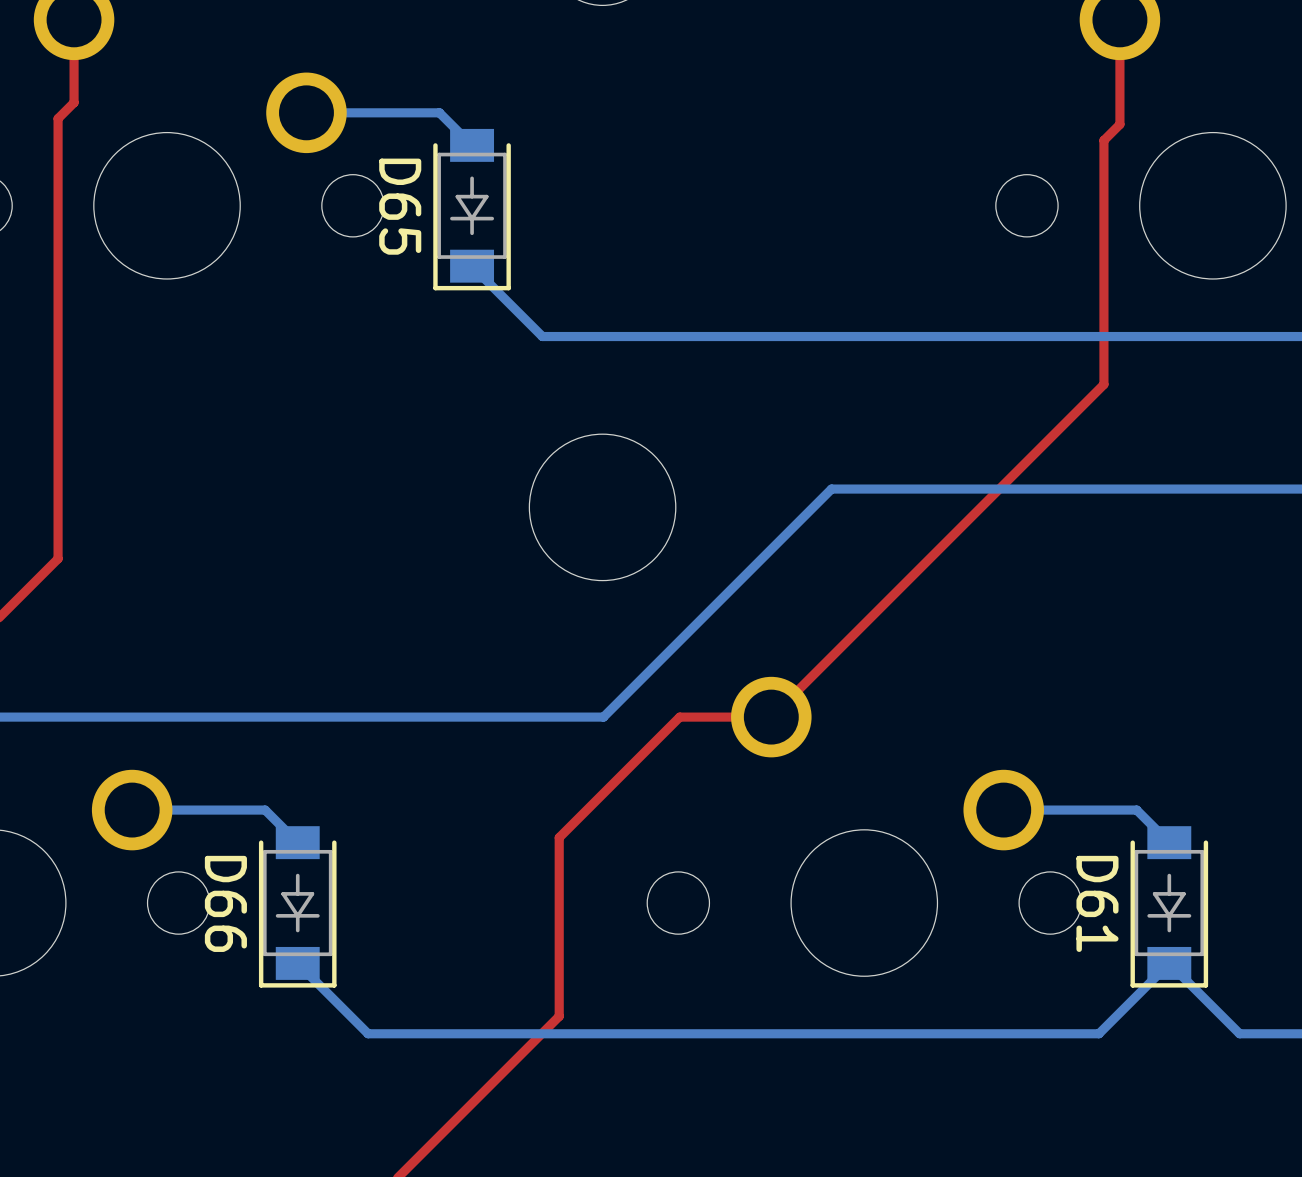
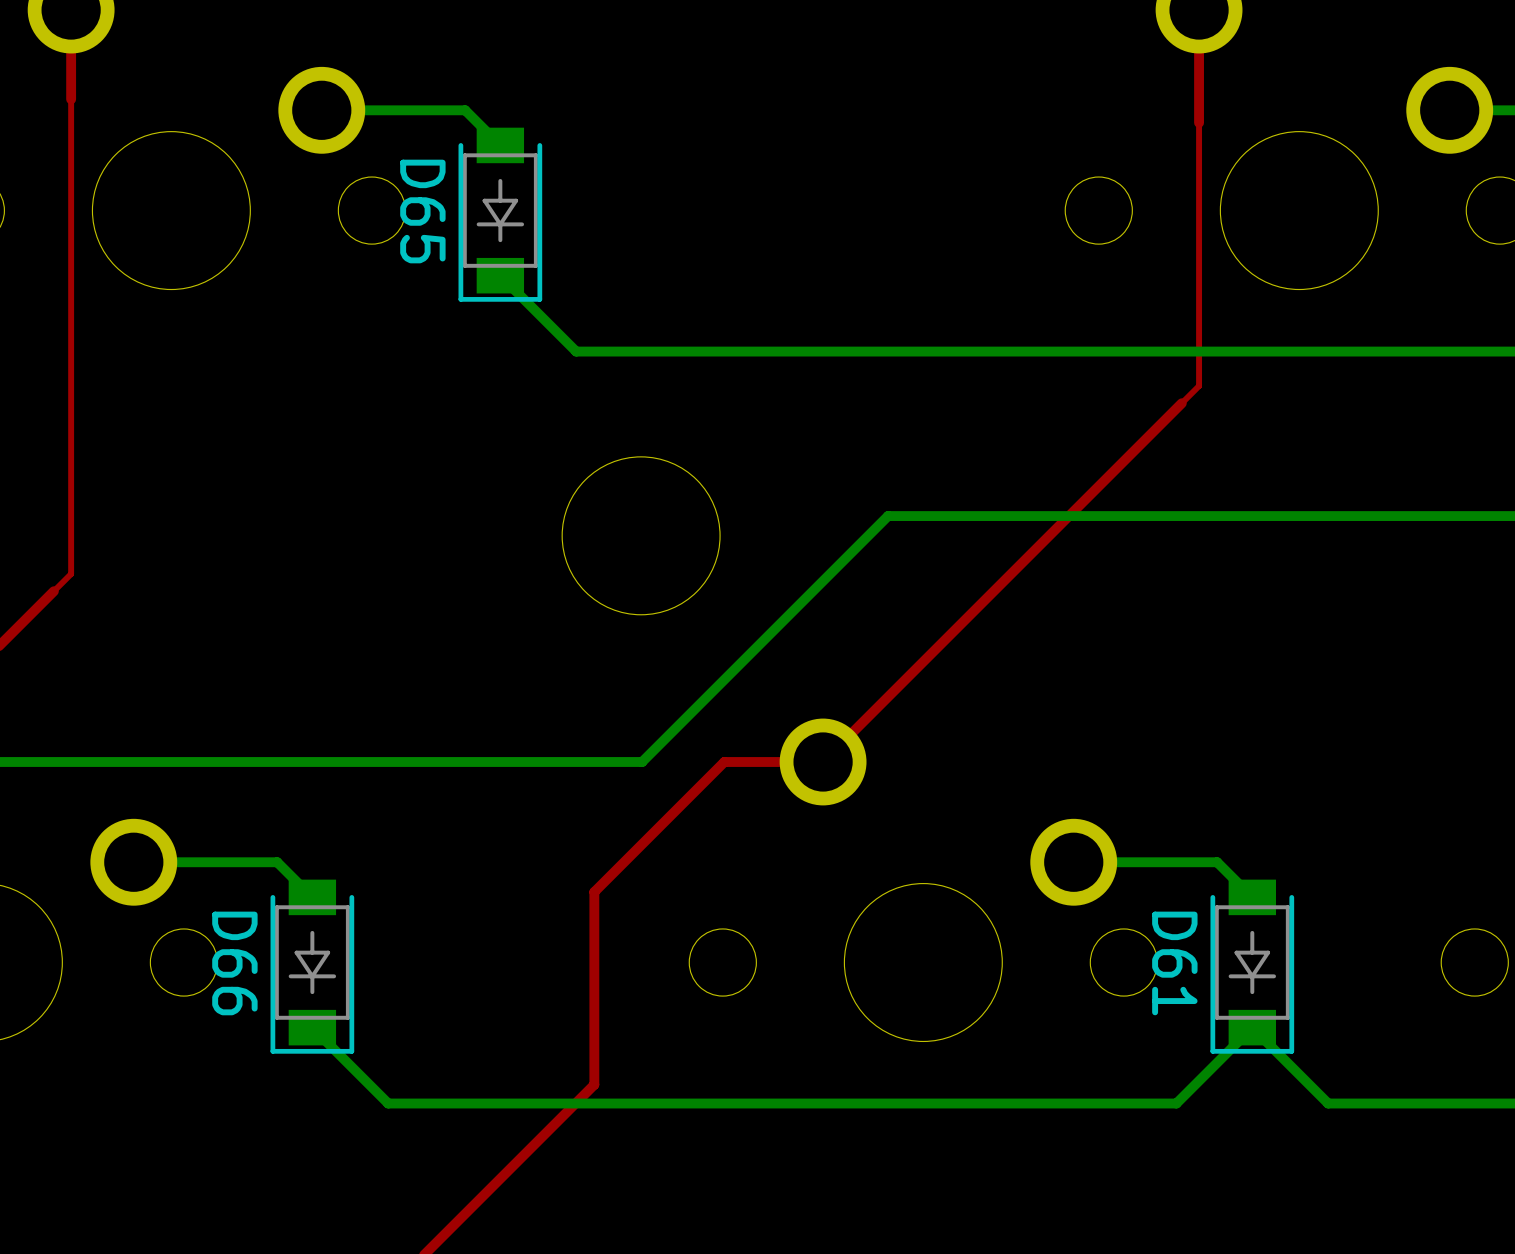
top track: (74, 102) (58, 118) (58, 558) -> (71, 99) (71, 574) (53, 591)
top track: (1119, 124) (1103, 140) (1103, 384) -> (1199, 122) (1199, 386) (1181, 403)

